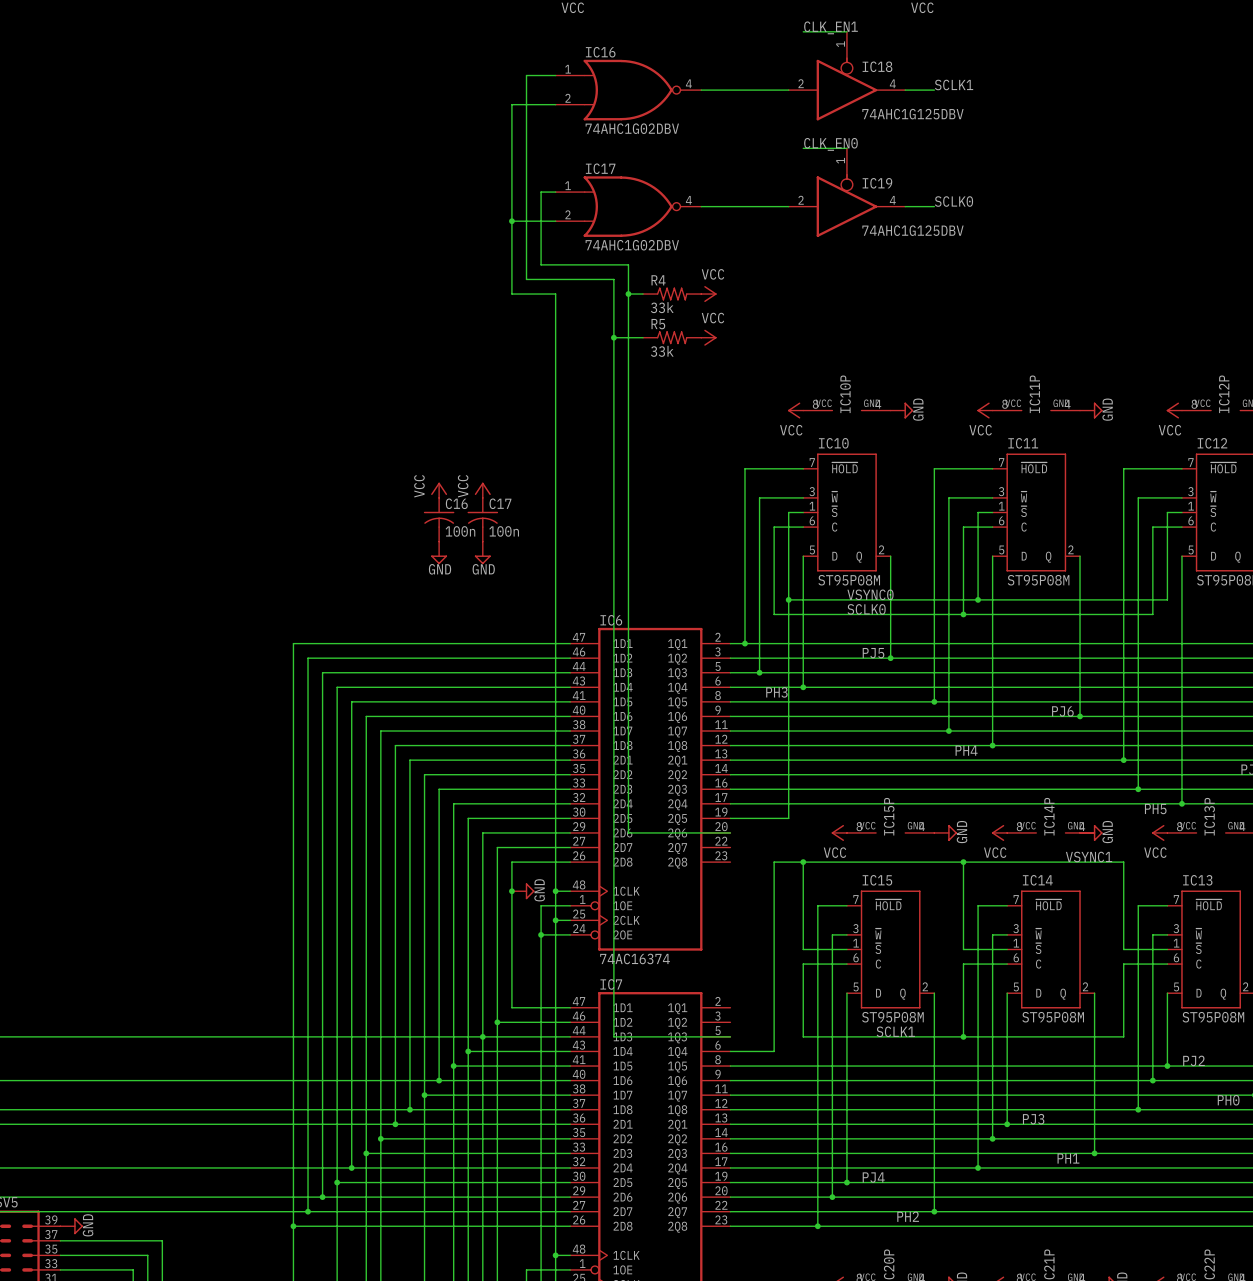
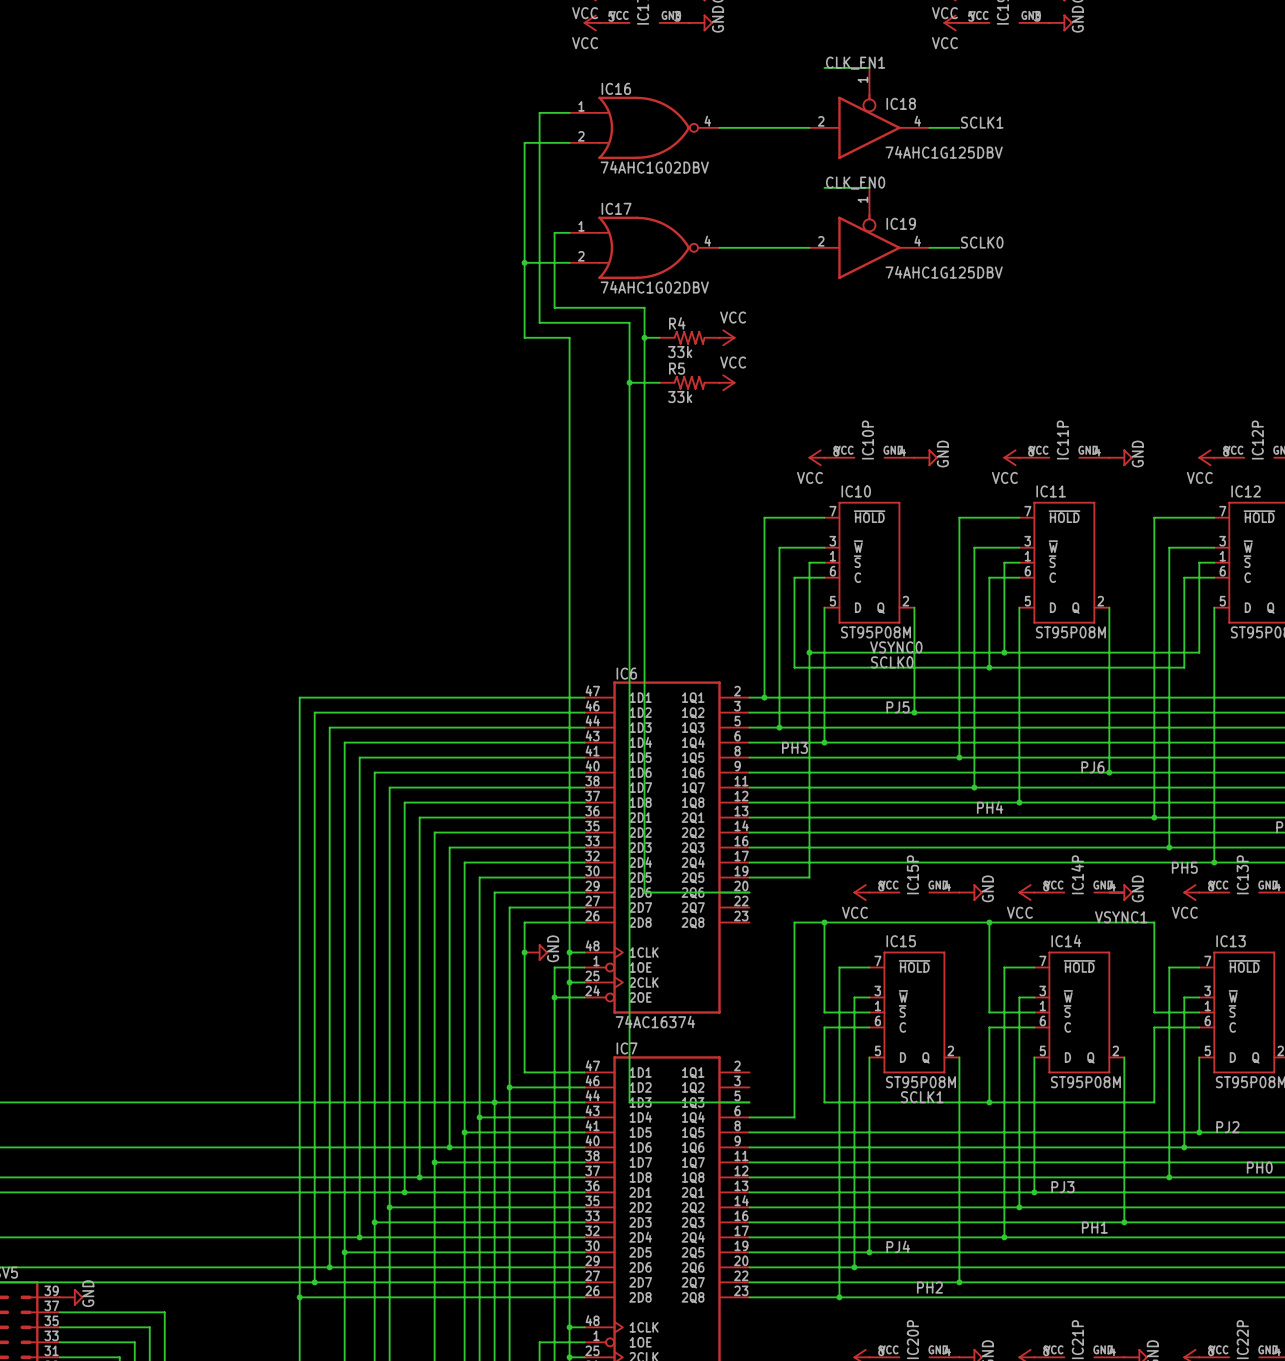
power symbol: VCC (439, 490) -> none
power symbol: VCC (482, 490) -> none
C16: 100n (439, 519) -> none
C17: 100n (482, 519) -> none
power symbol: GND (439, 552) -> none
power symbol: GND (482, 552) -> none

